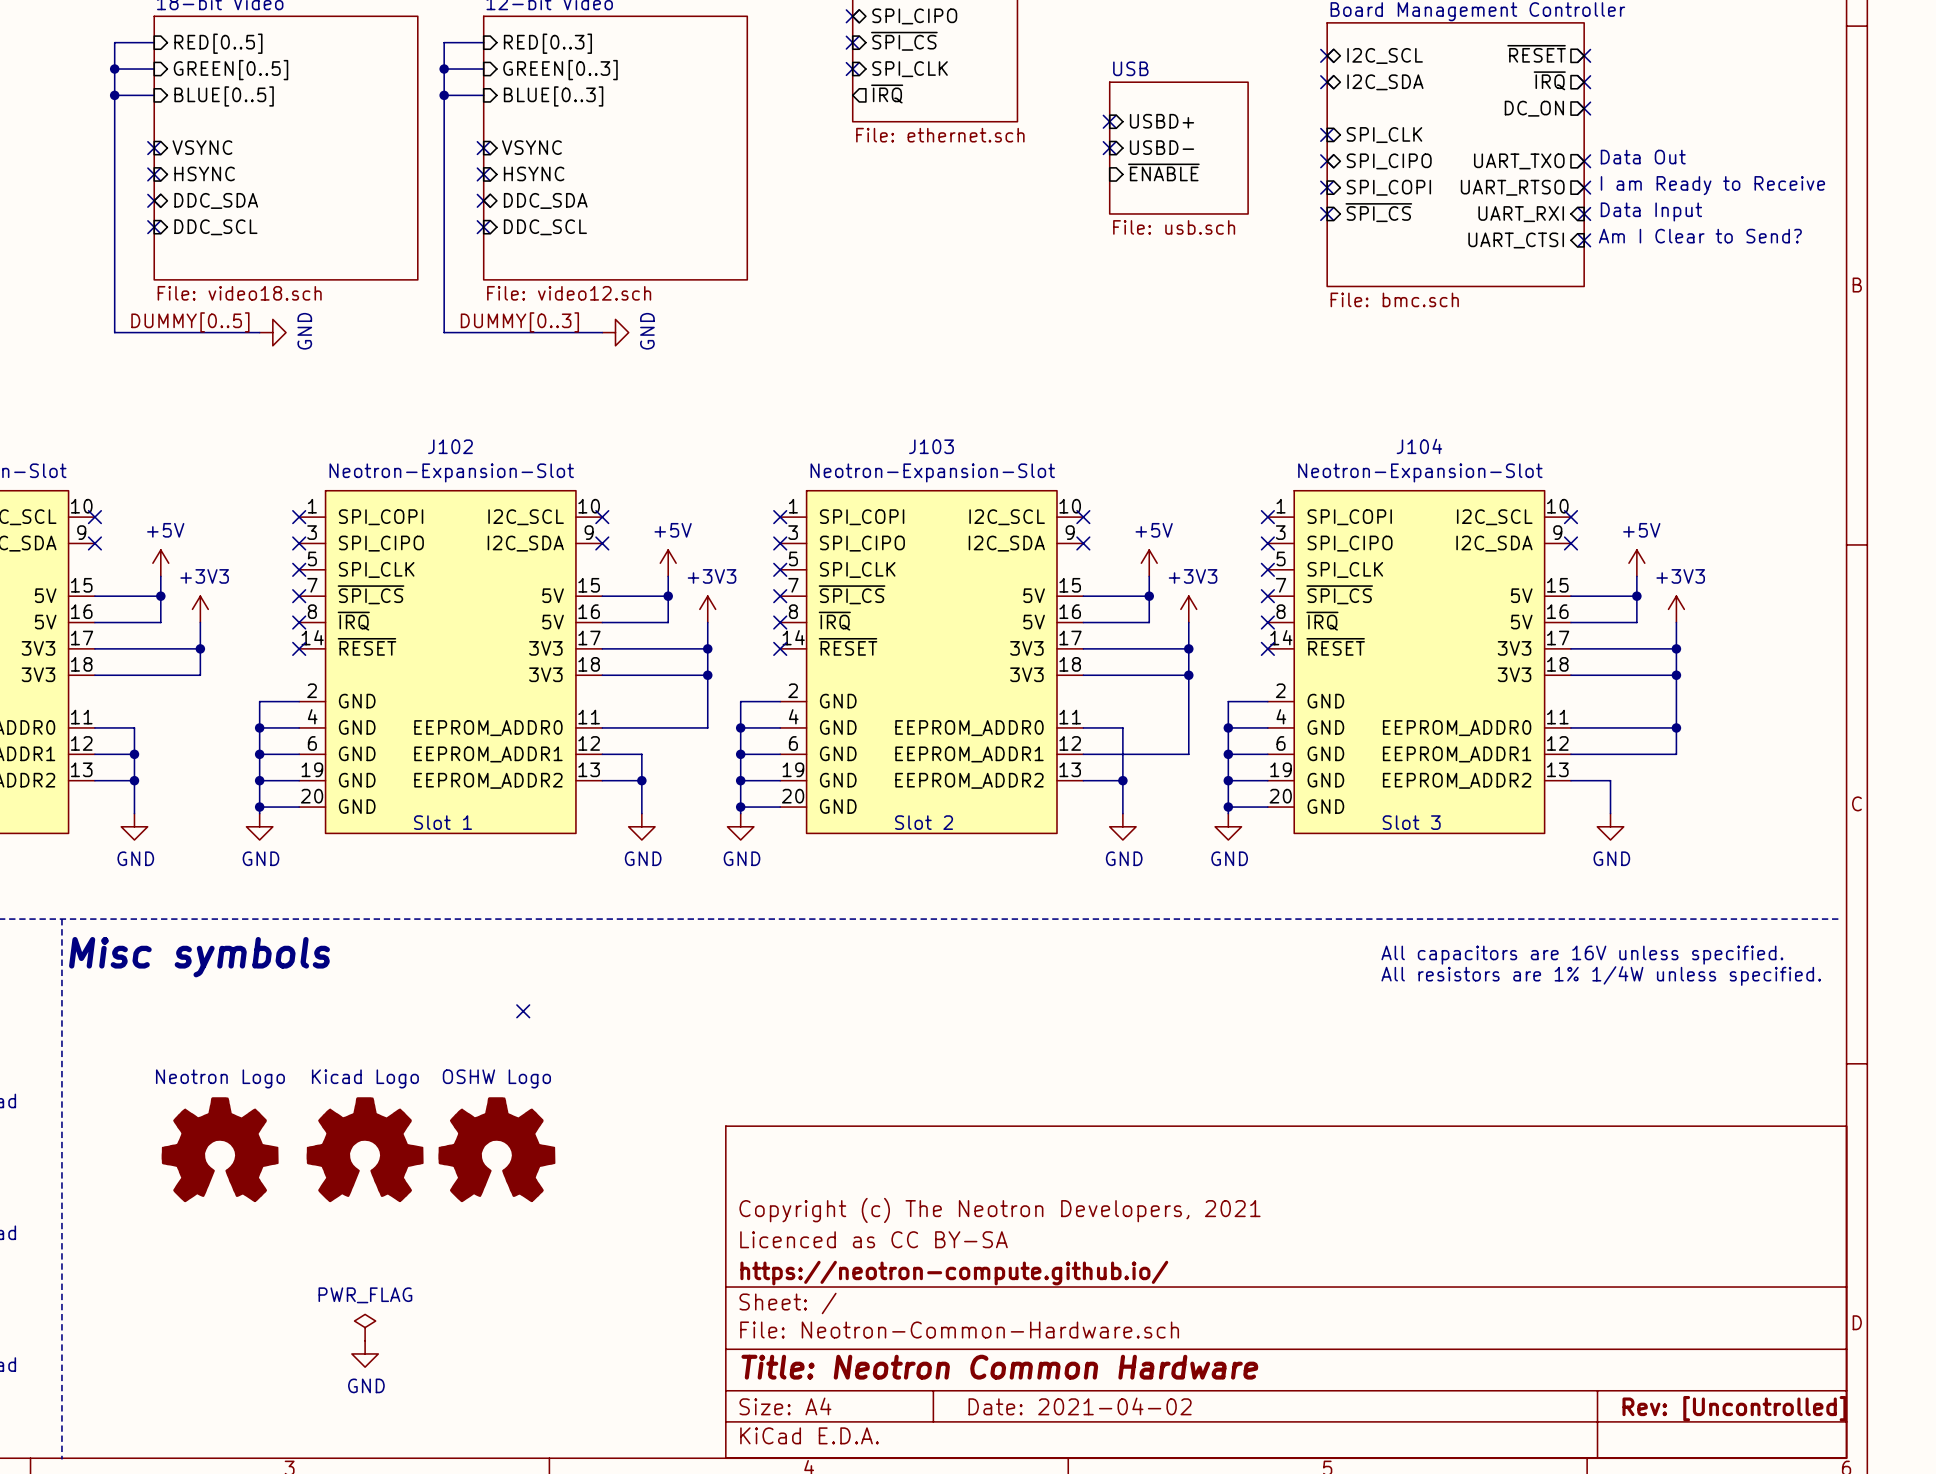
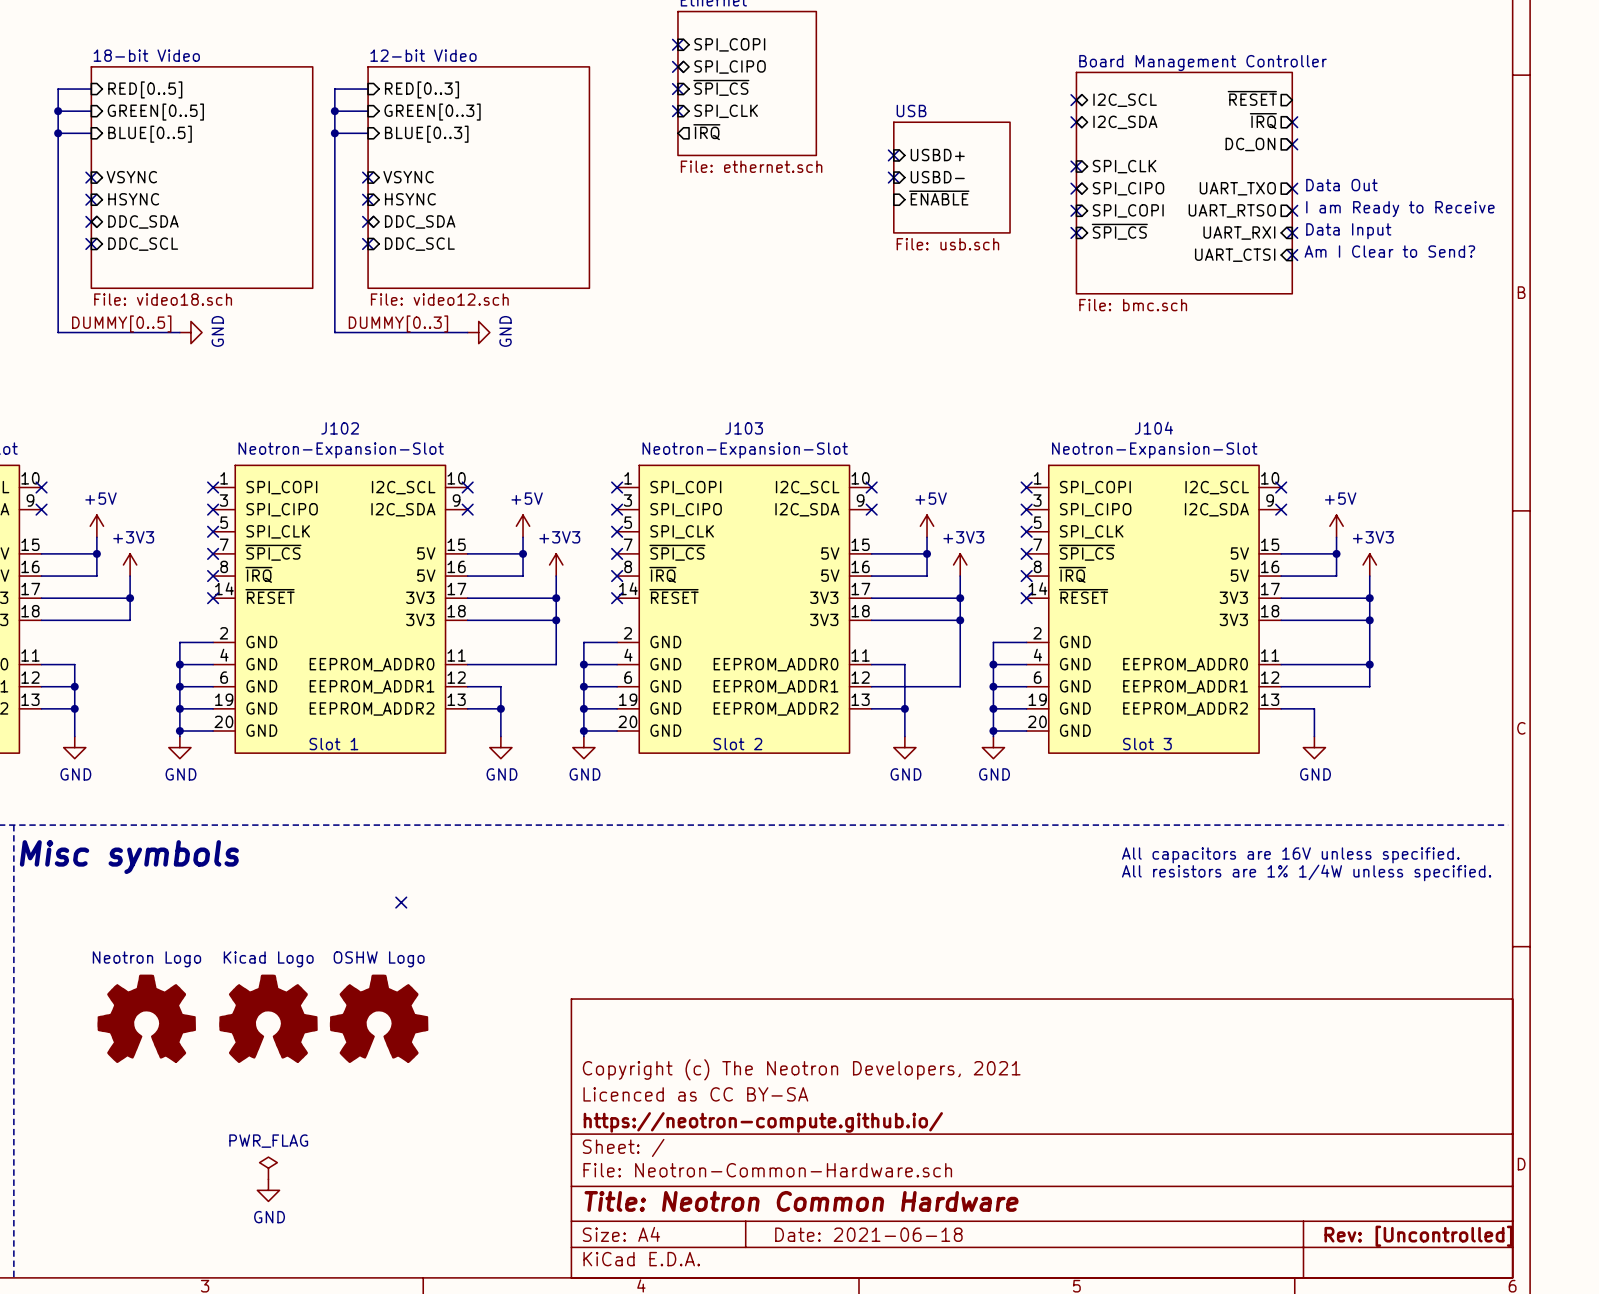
no-connect mark: (1584, 55) -> none
title block: Date: 2021-04-02 (1080, 1406) -> Date: 2021-06-18 (868, 1234)

